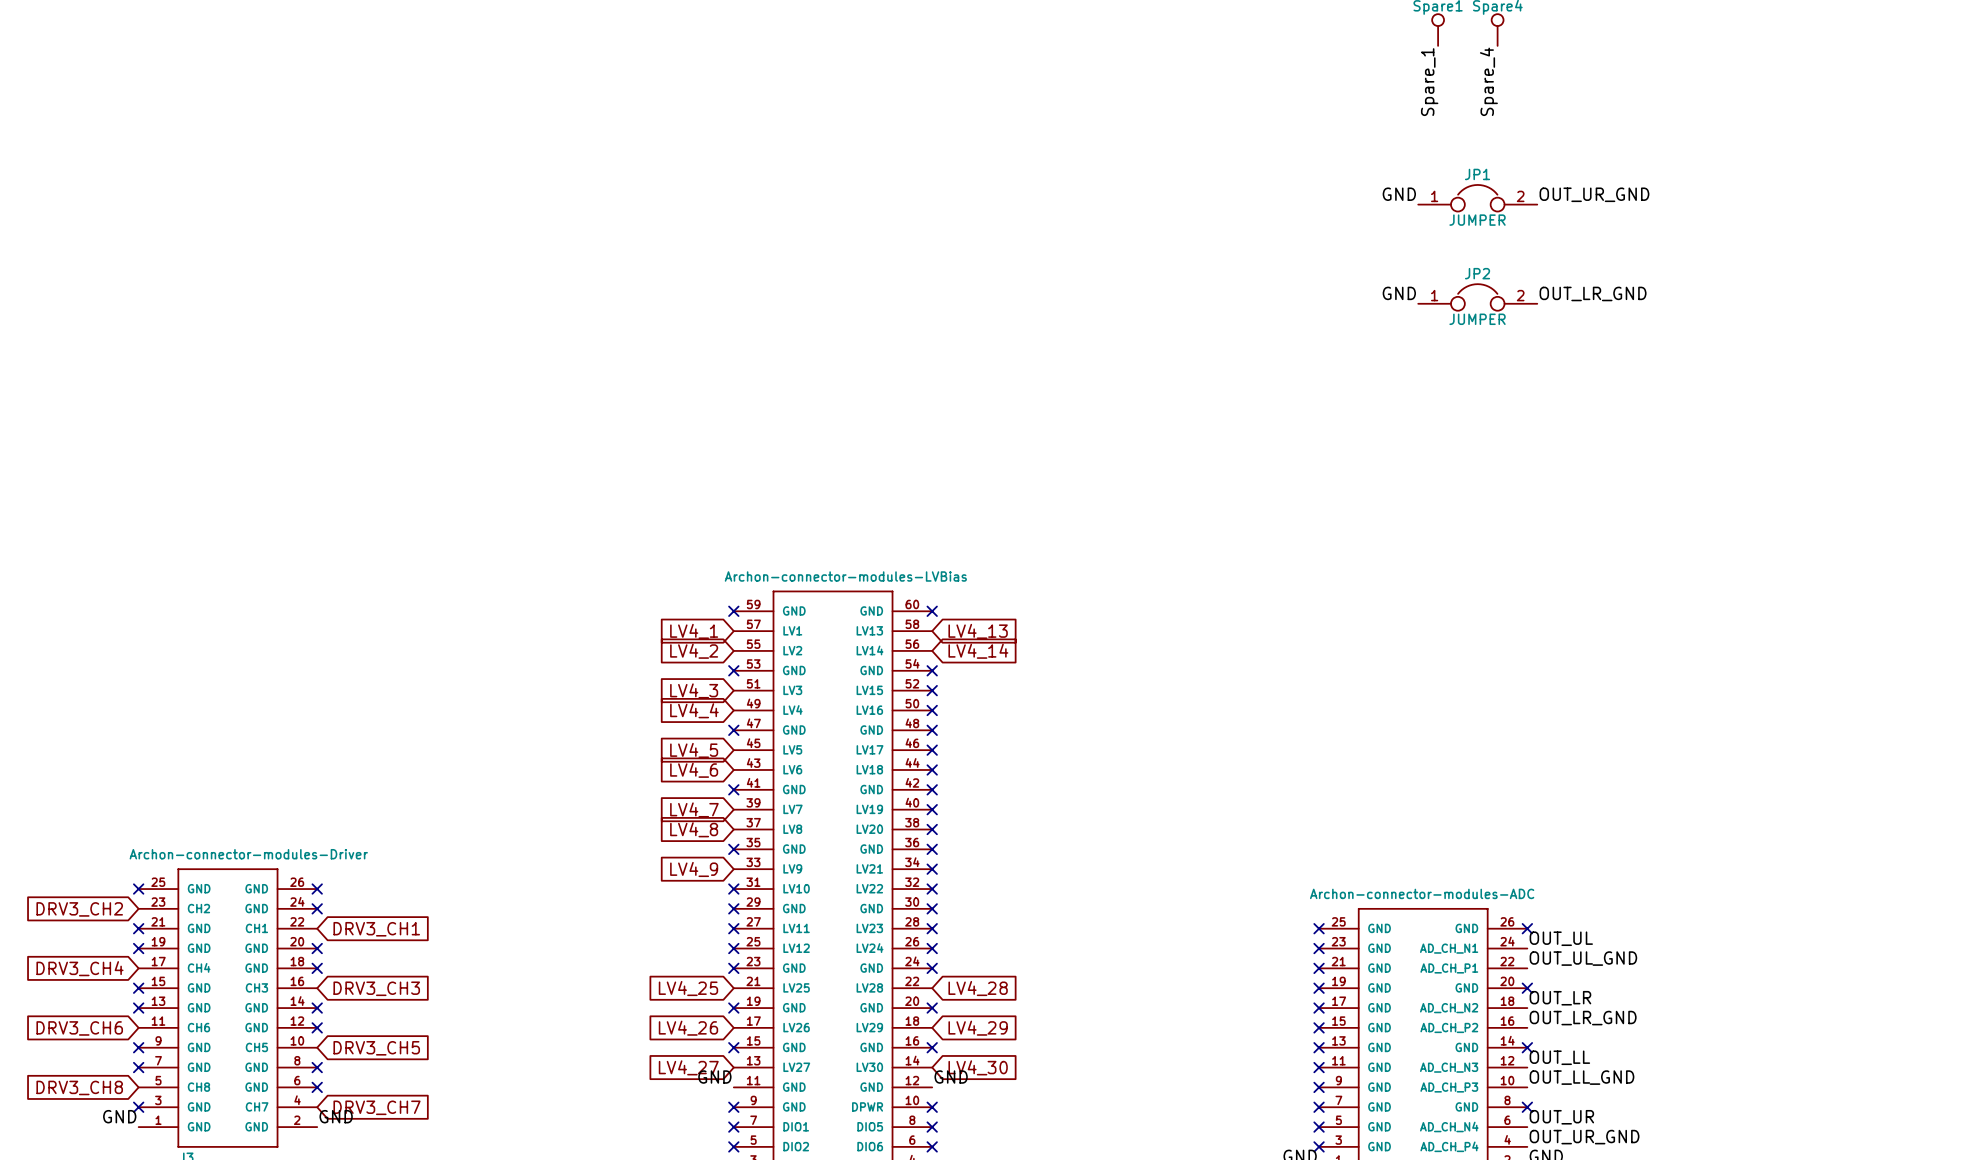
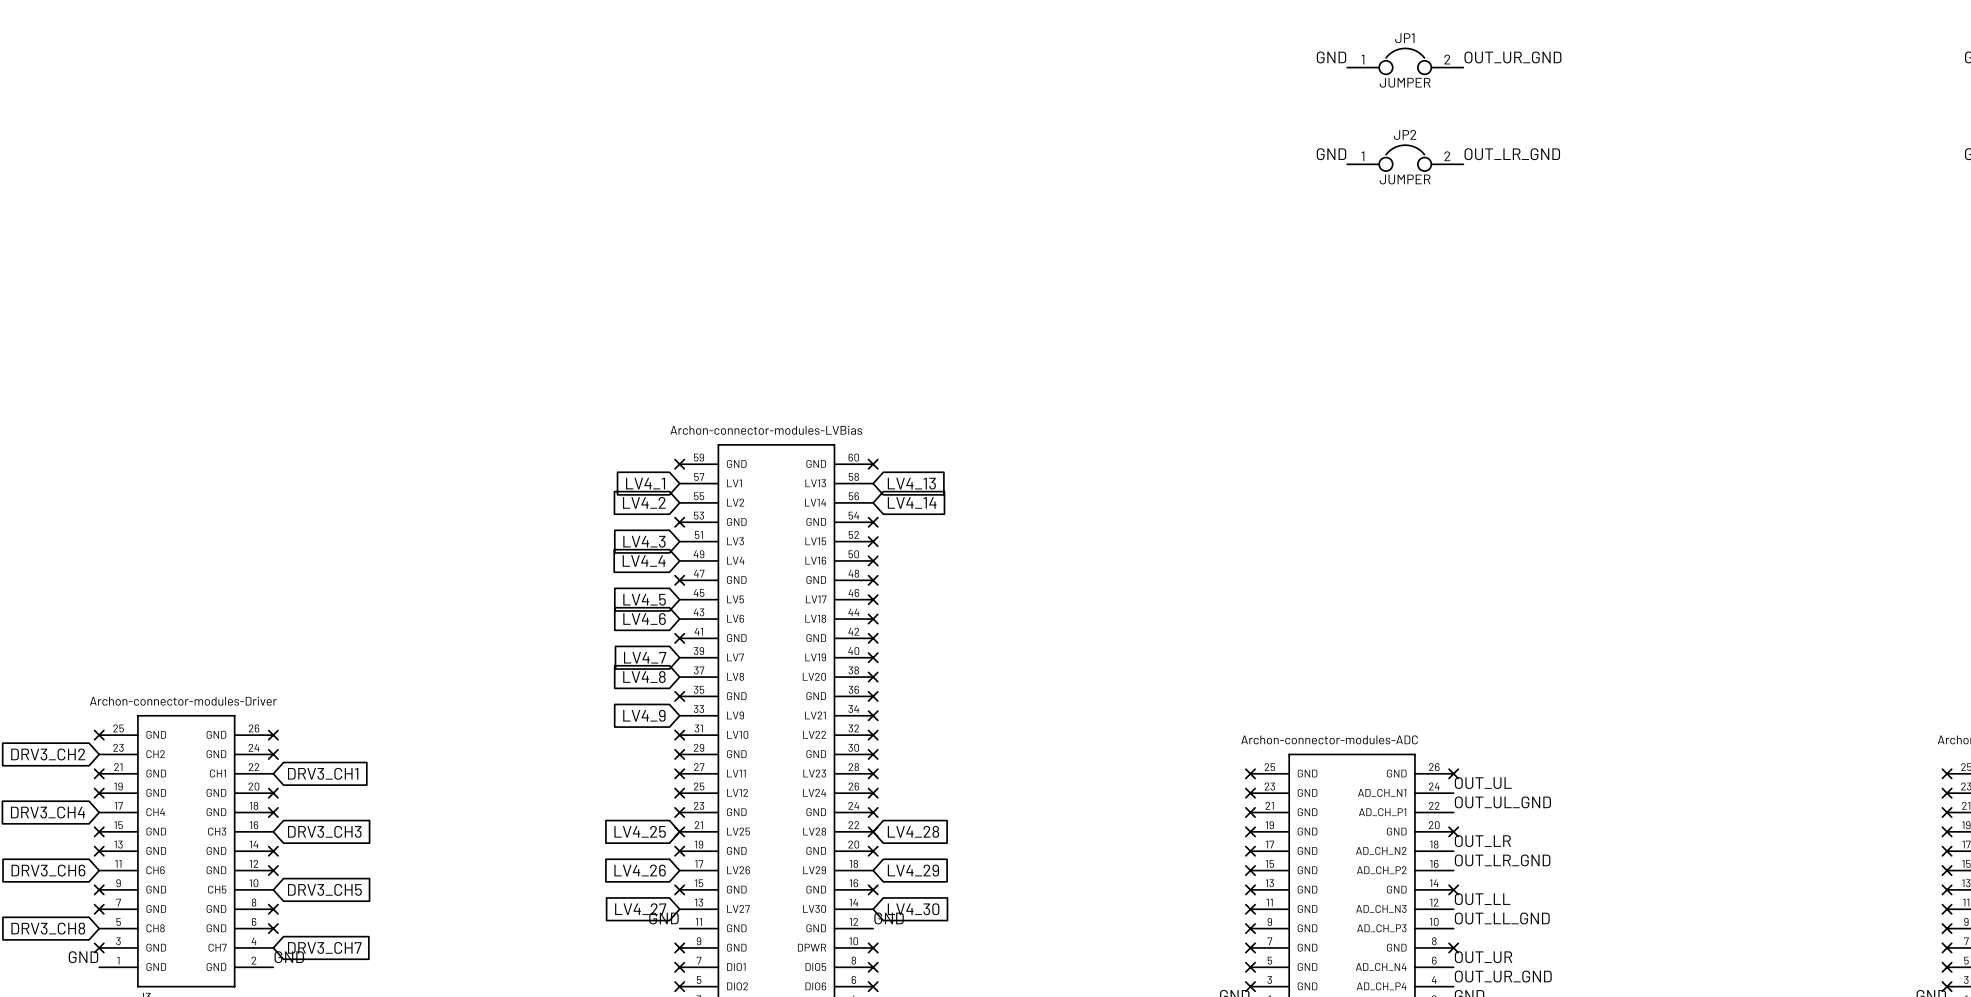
no-connect mark: none -> (679, 831)
no-connect mark: none -> (873, 831)

